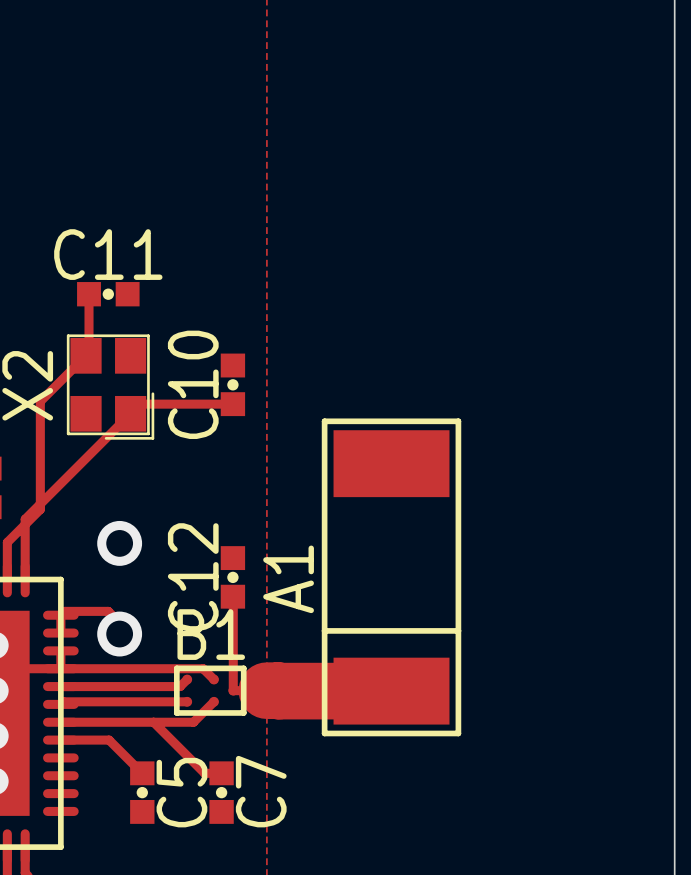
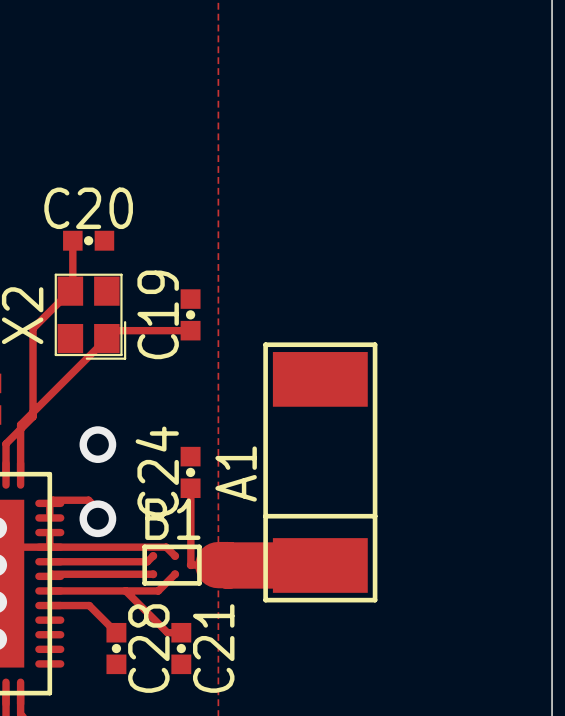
C11 name: C11 (108, 254) -> C20 (88, 208)
C10 name: C10 (193, 384) -> C19 (158, 314)
C12 name: C12 (193, 577) -> C24 (157, 471)
C7 name: C7 (261, 791) -> C21 (213, 648)
C5 name: C5 (181, 792) -> C28 (148, 648)

